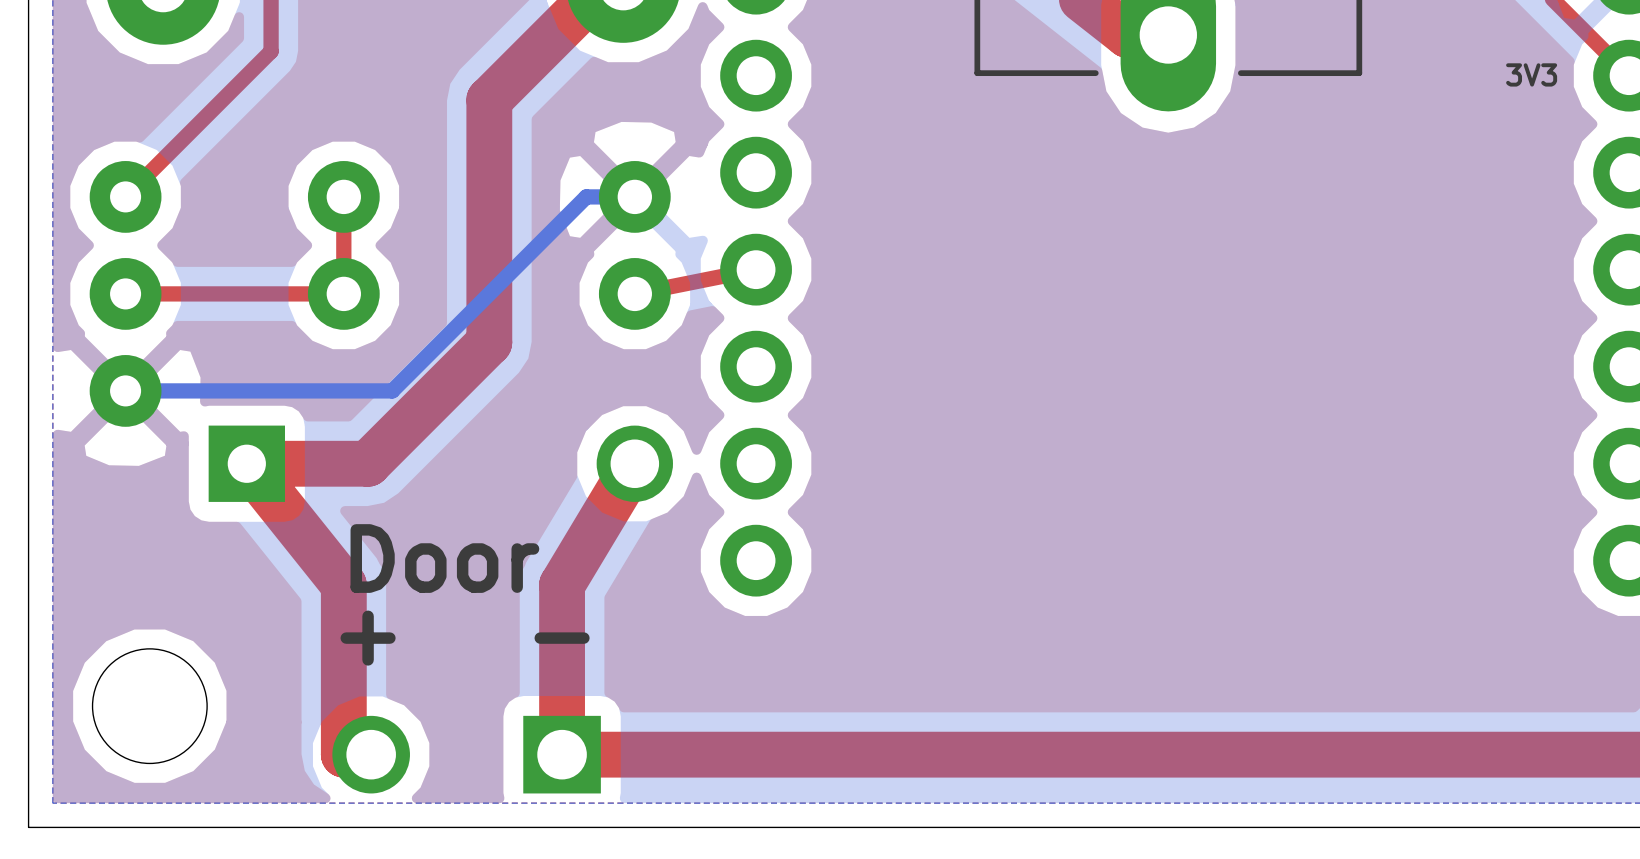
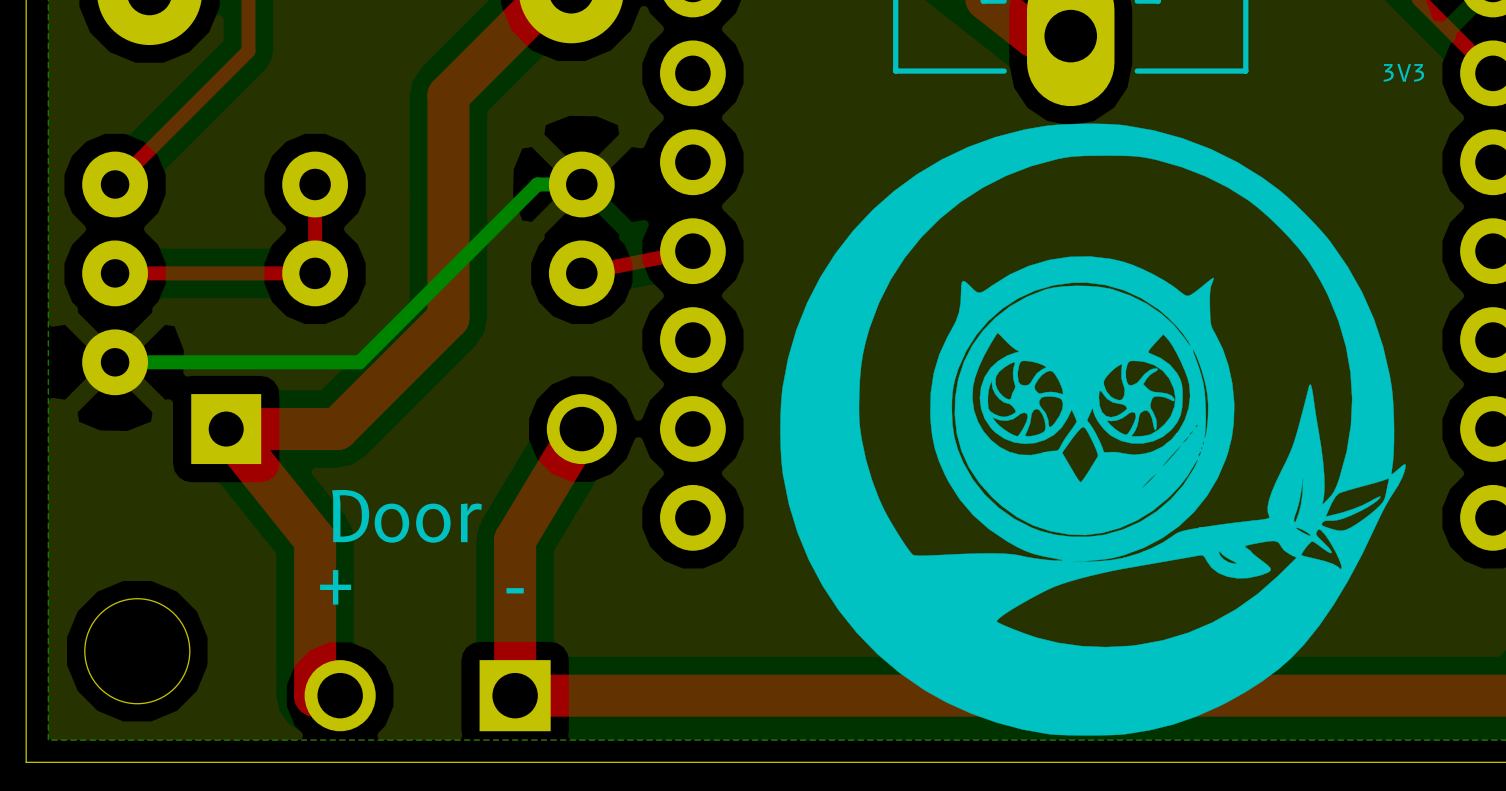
drawing: none -> [780, 123, 1406, 736]

